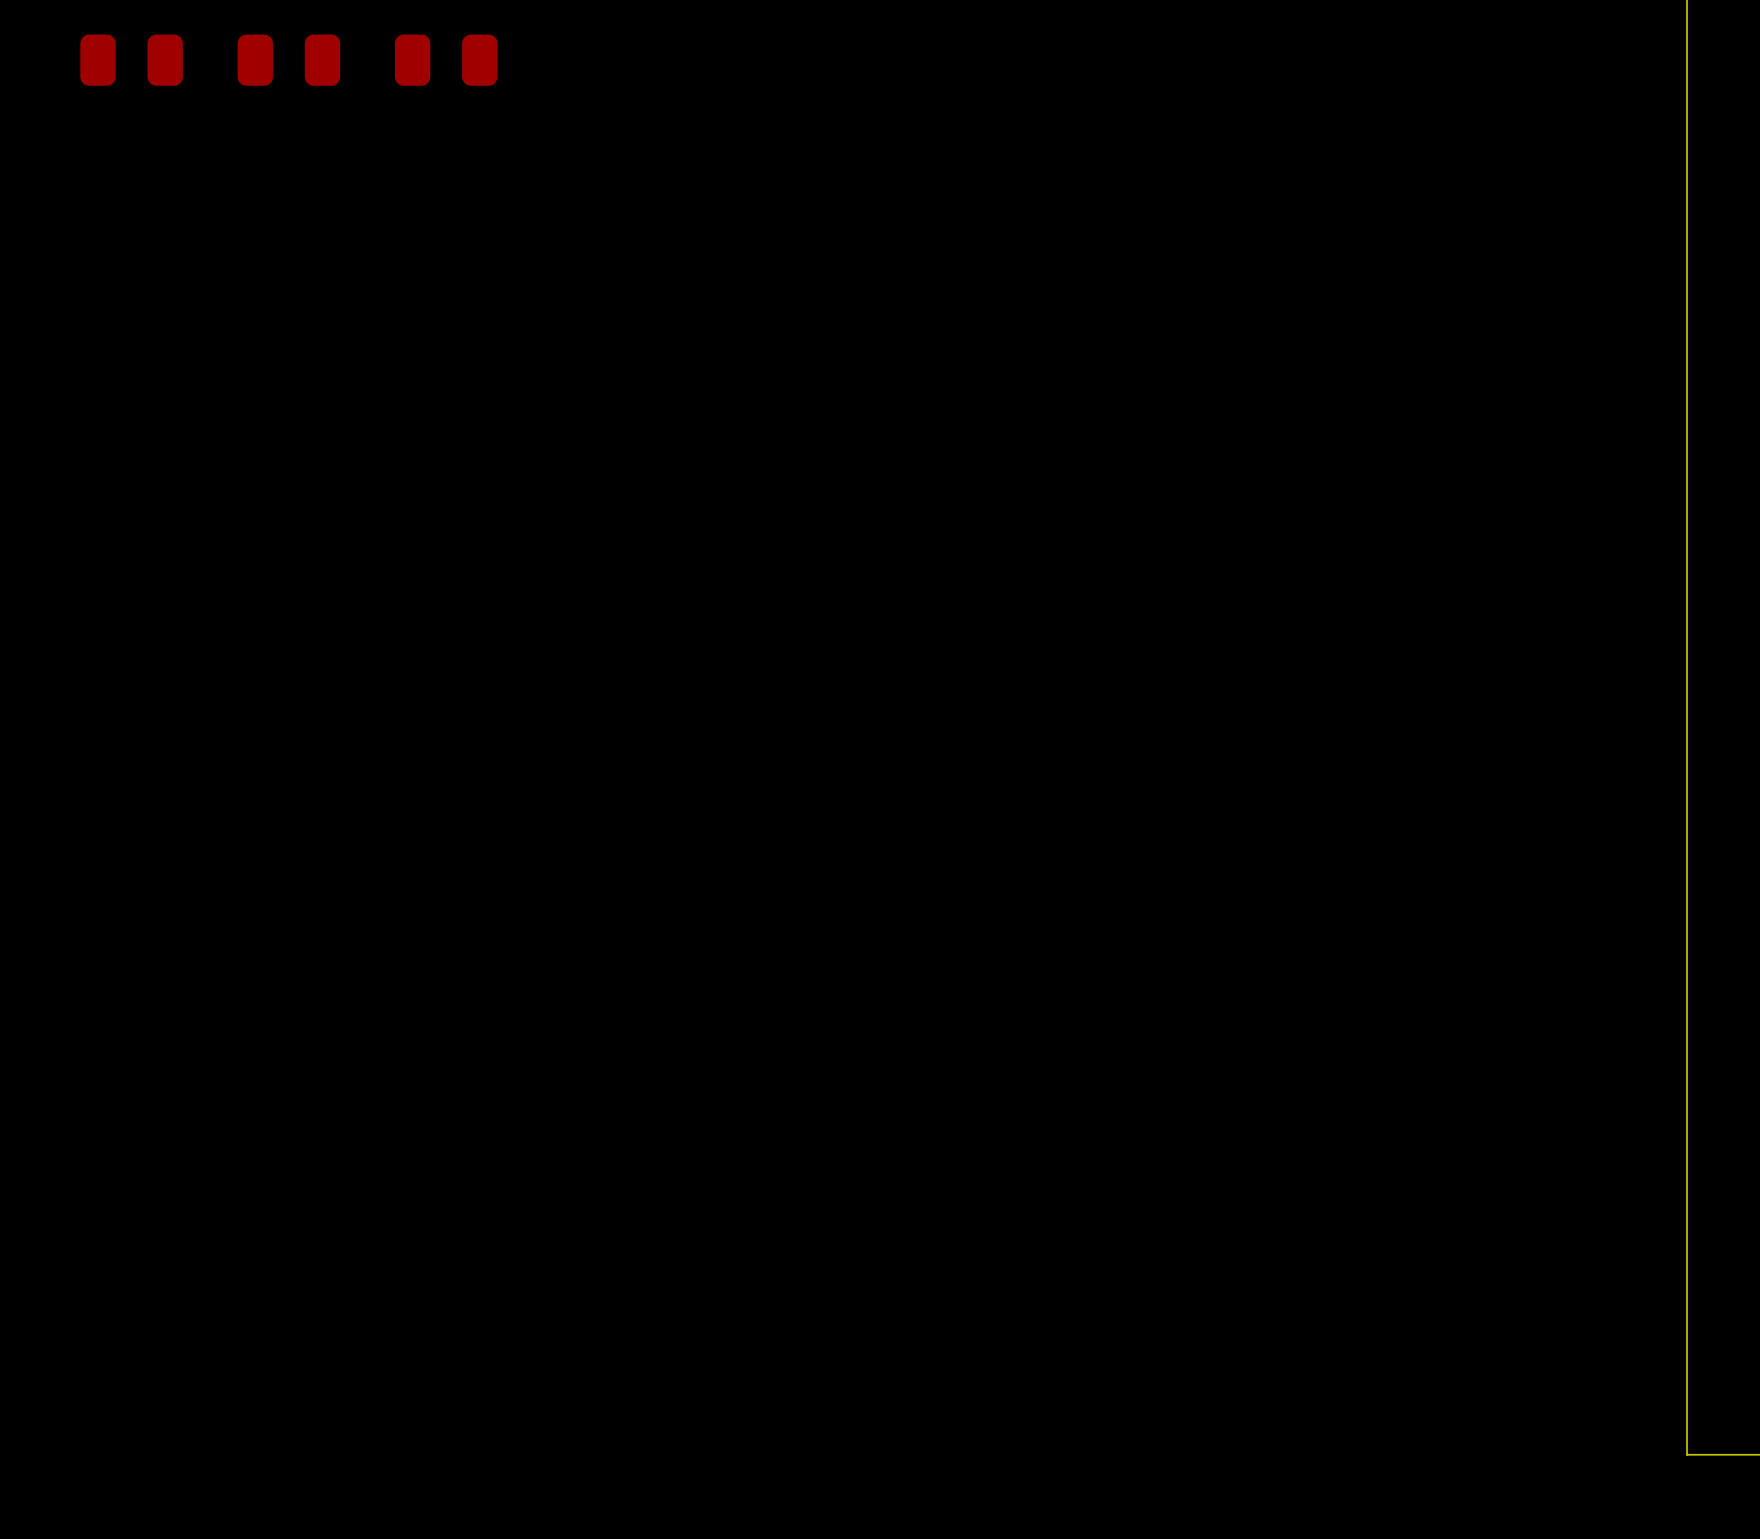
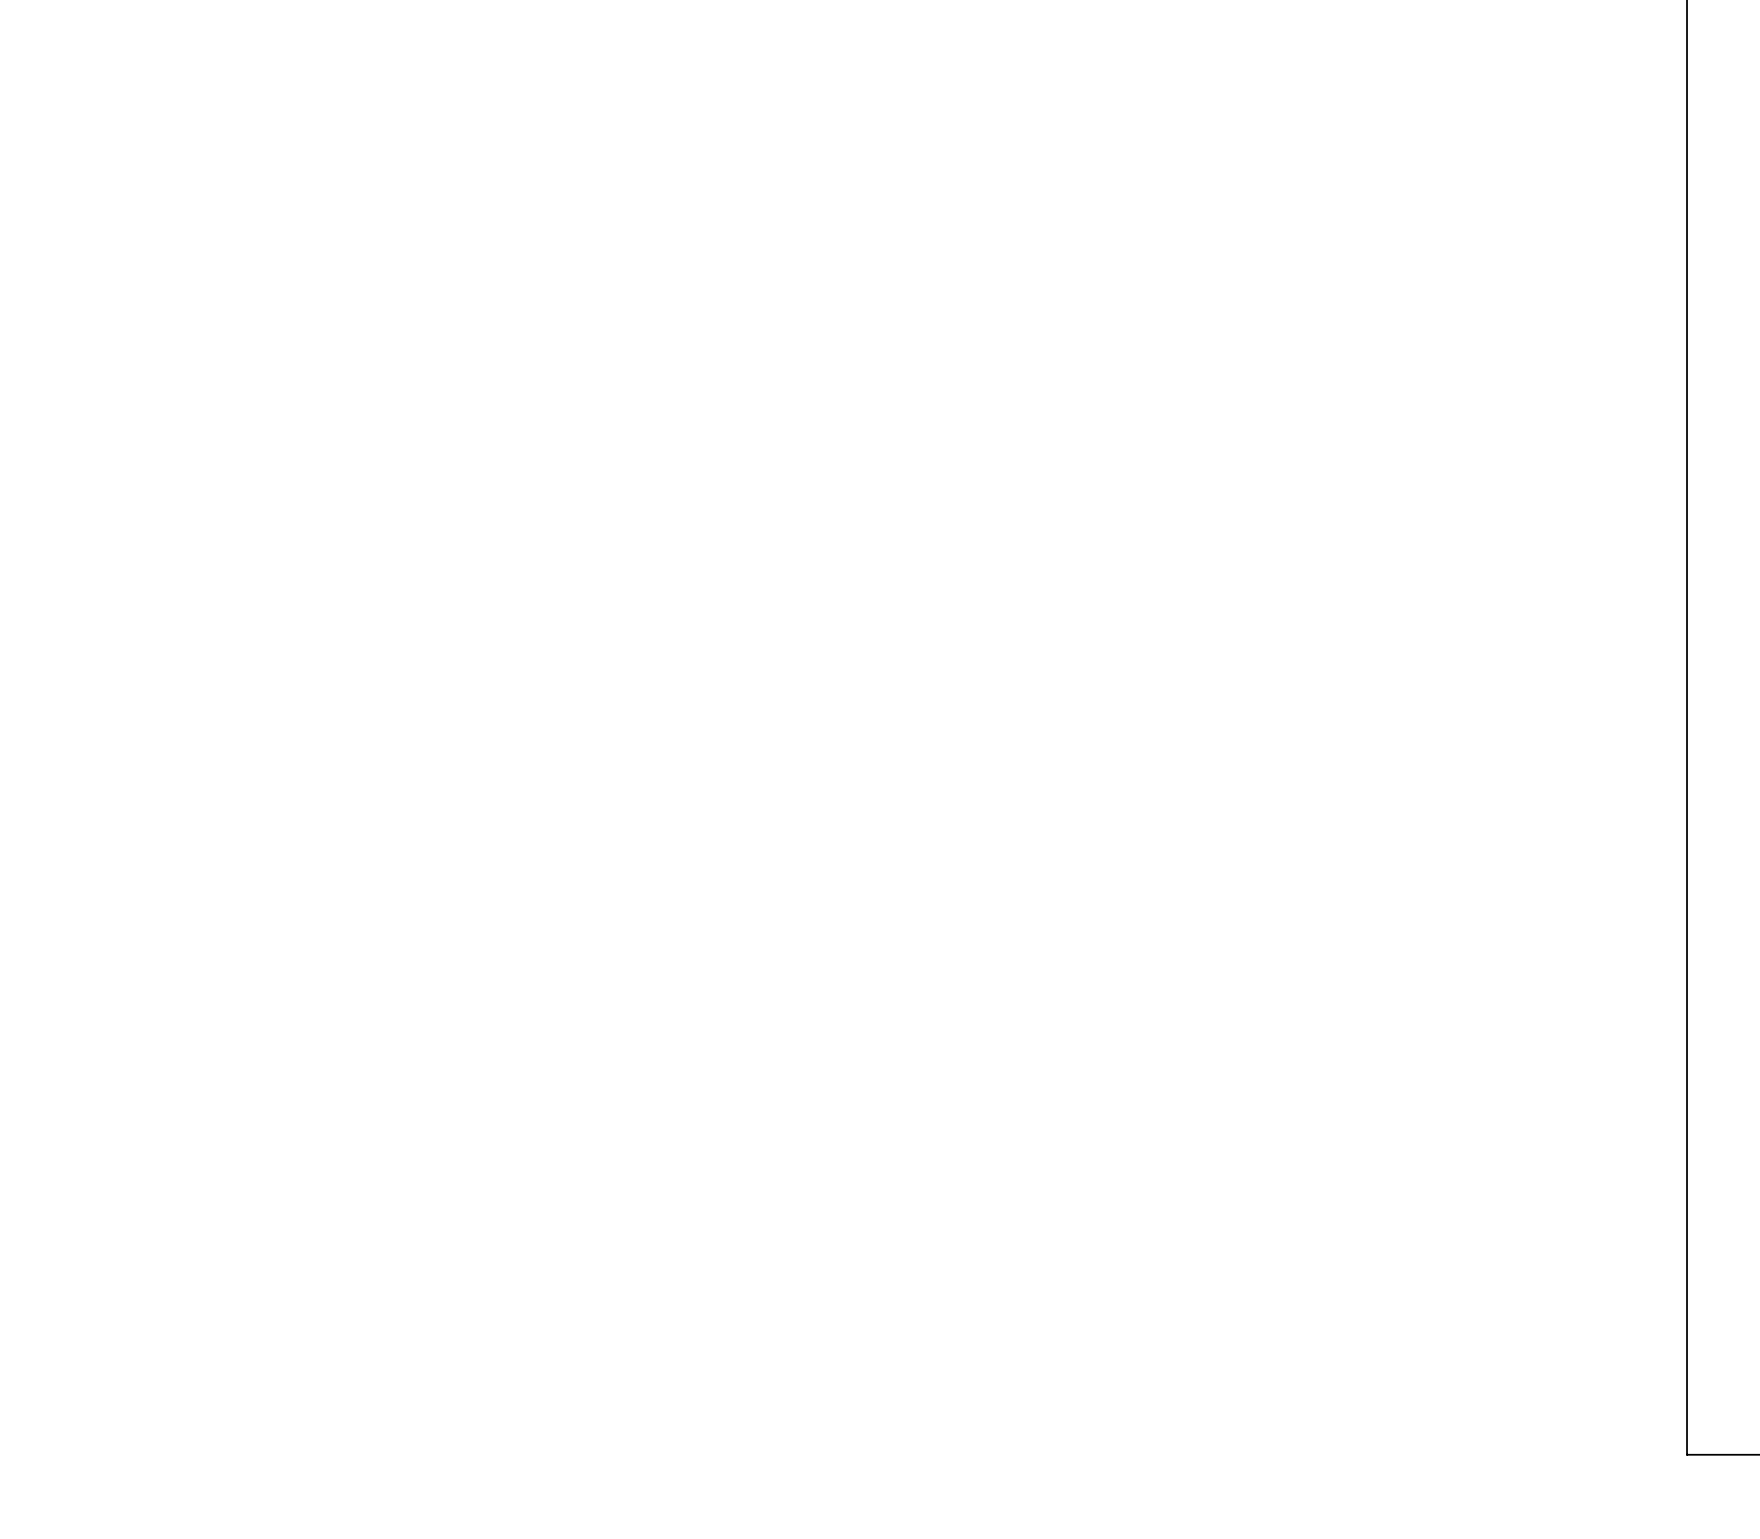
part: (131, 60) -> none
part: (288, 60) -> none
part: (446, 60) -> none

